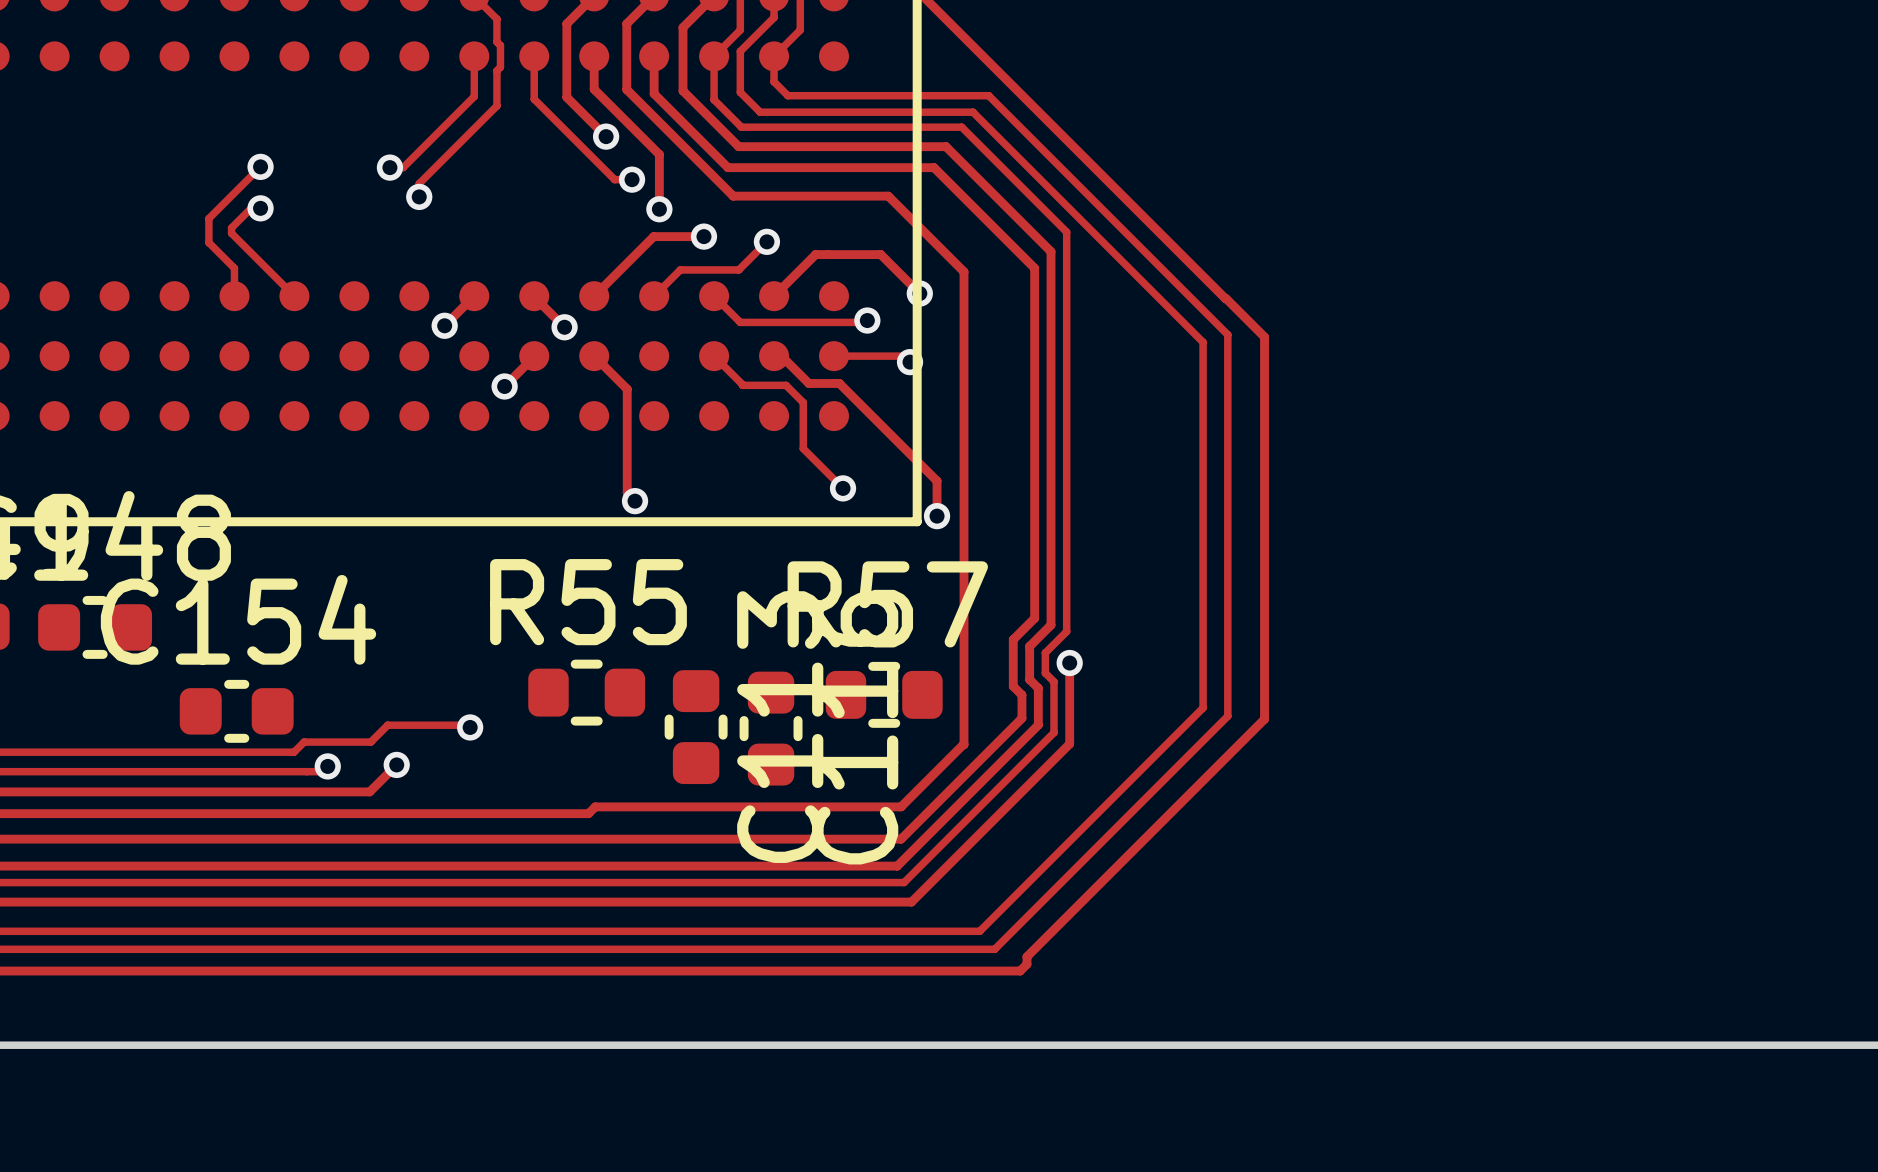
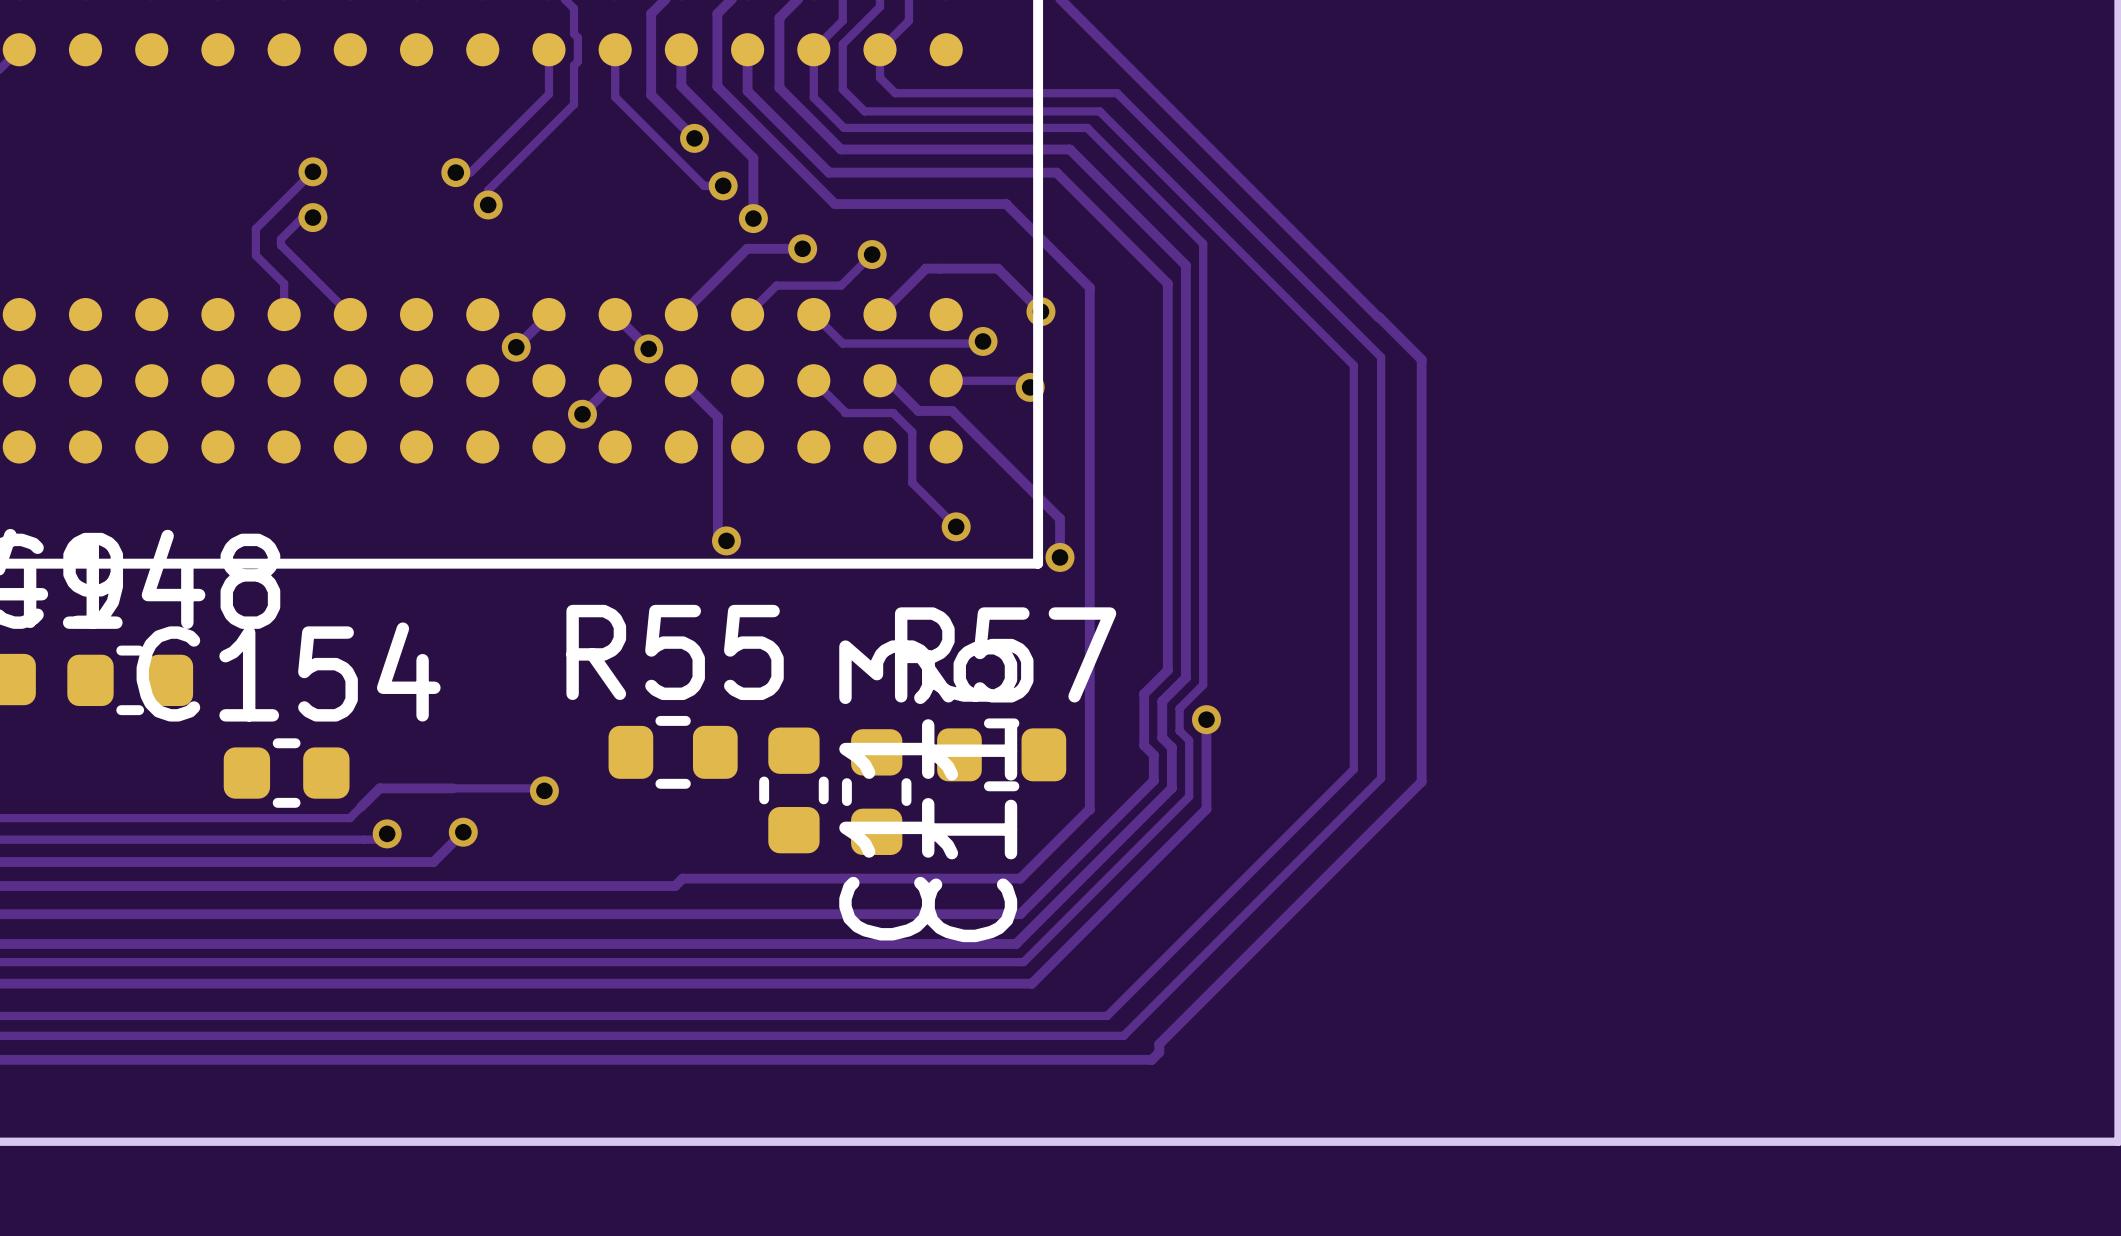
track: (387, 725) (370, 742) (304, 742) -> (453, 788) (379, 788) (361, 806)

